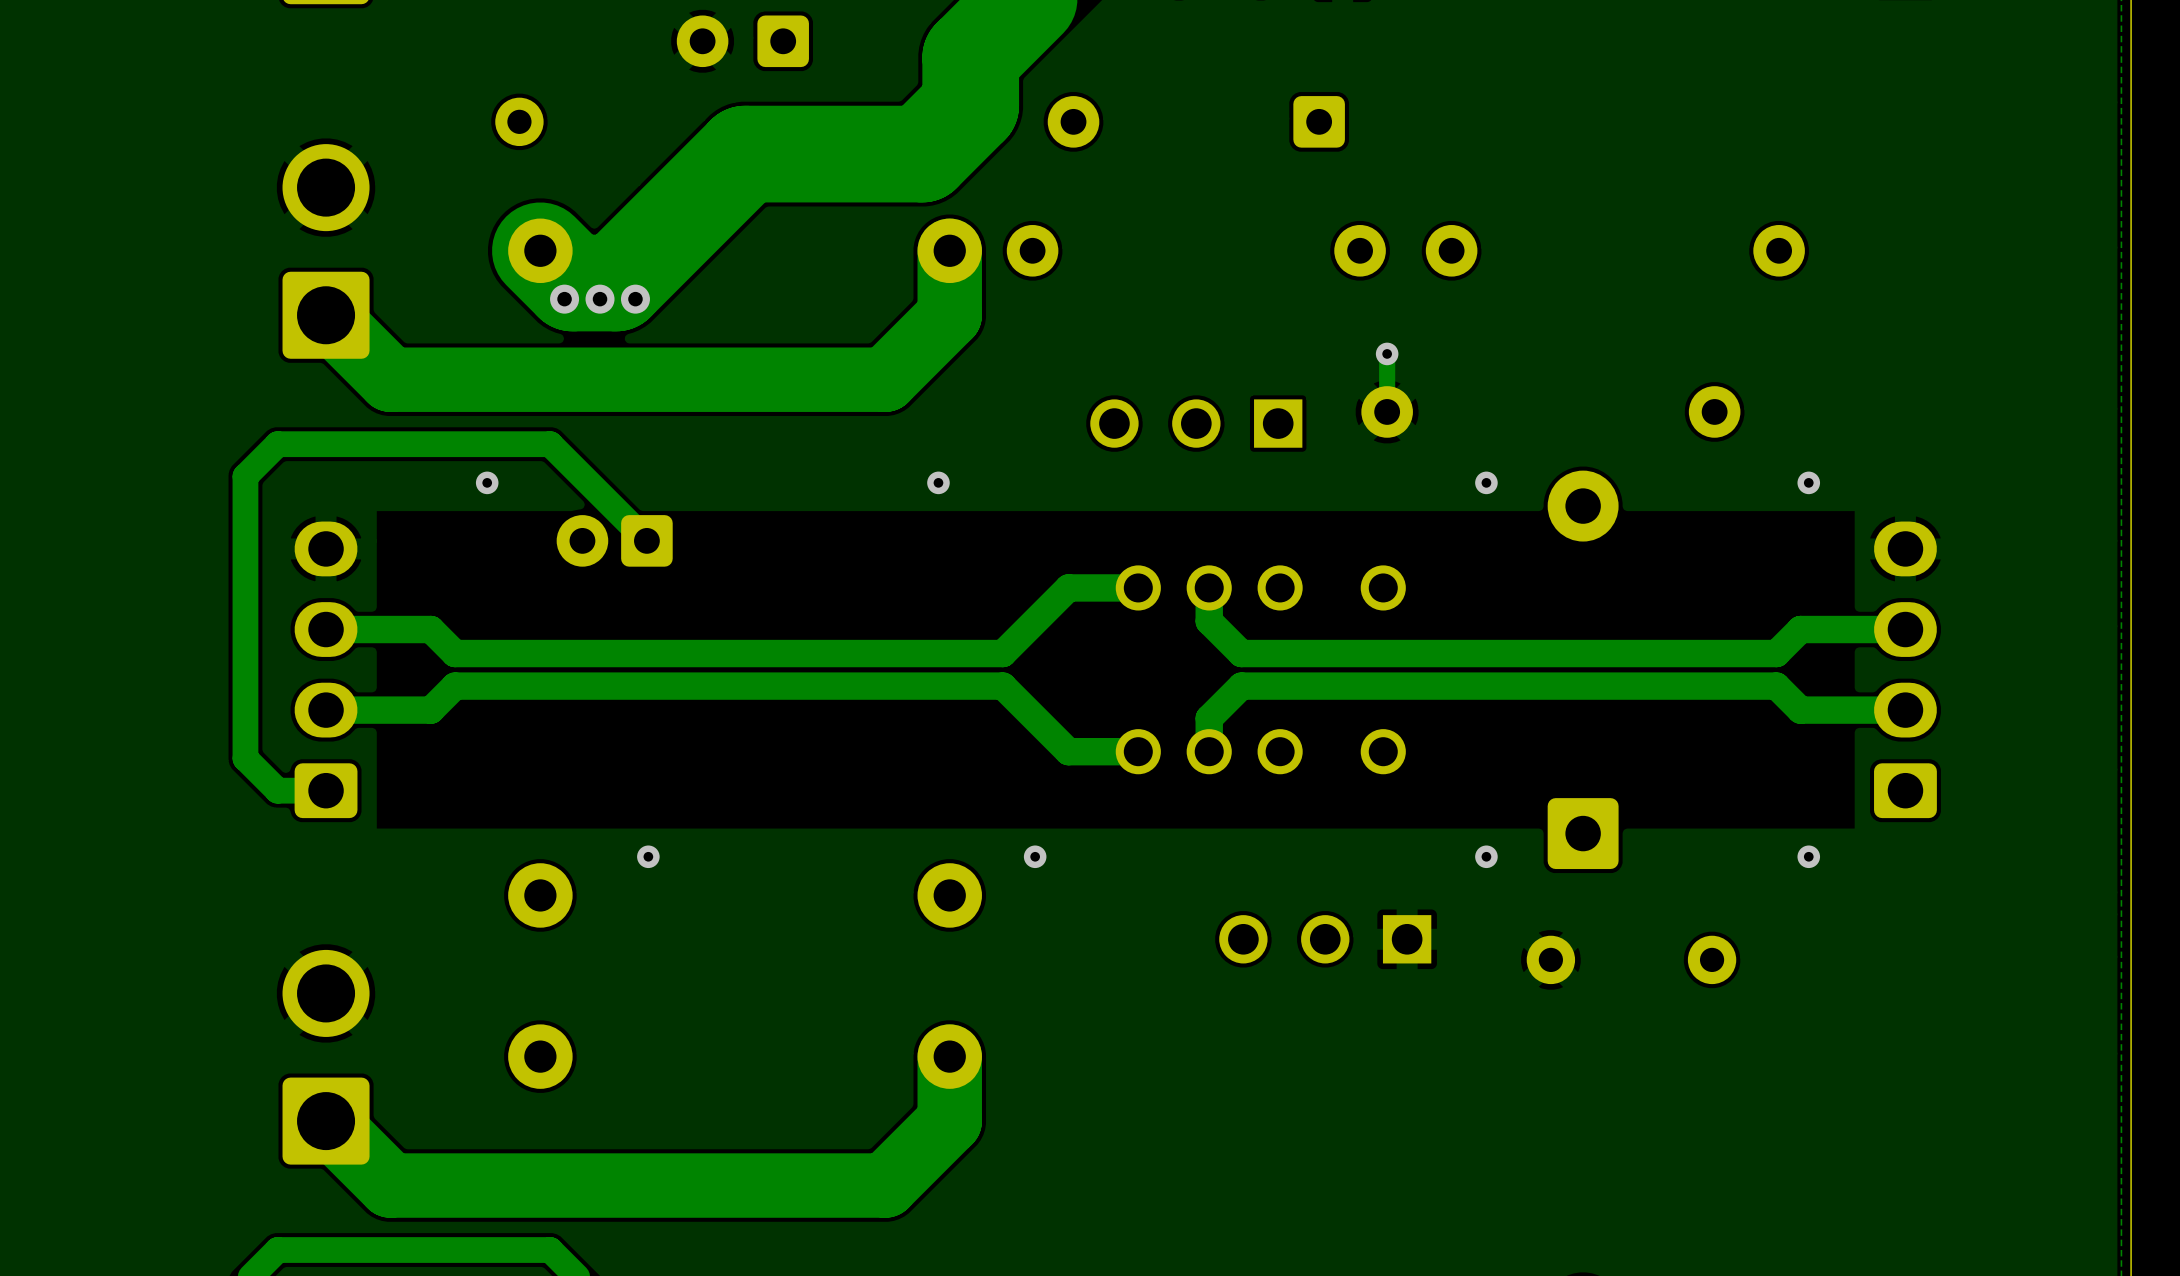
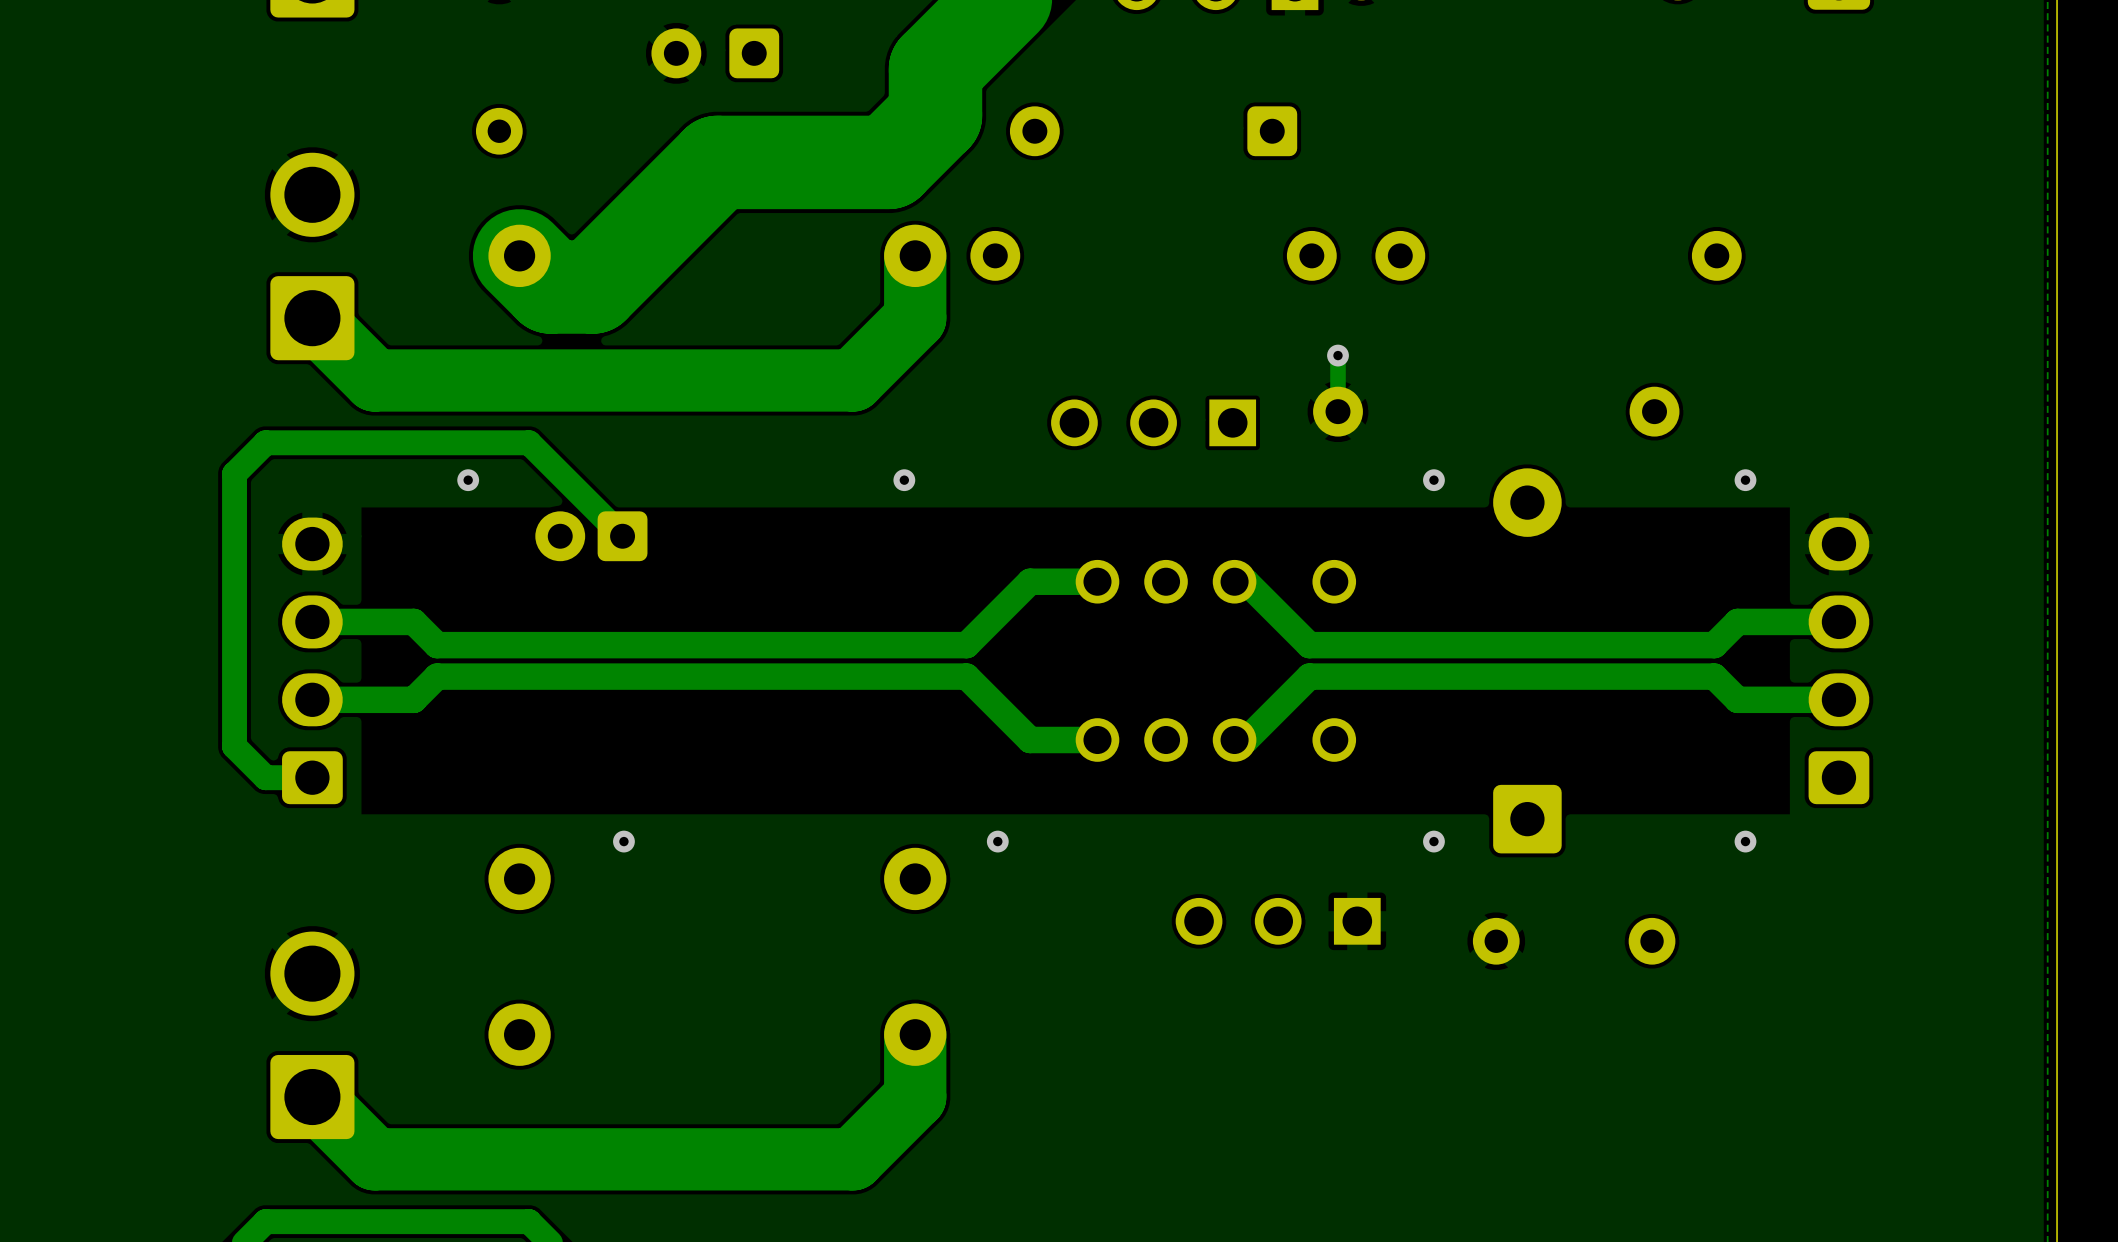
via: (564, 299) -> none
via: (600, 299) -> none
via: (635, 299) -> none
track: (1209, 587) (1209, 621) (1241, 653) (1357, 653) -> (1234, 581) (1245, 581) (1309, 645)
track: (1357, 686) (1241, 686) (1209, 718) (1209, 751) -> (1309, 676) (1245, 740) (1234, 740)

